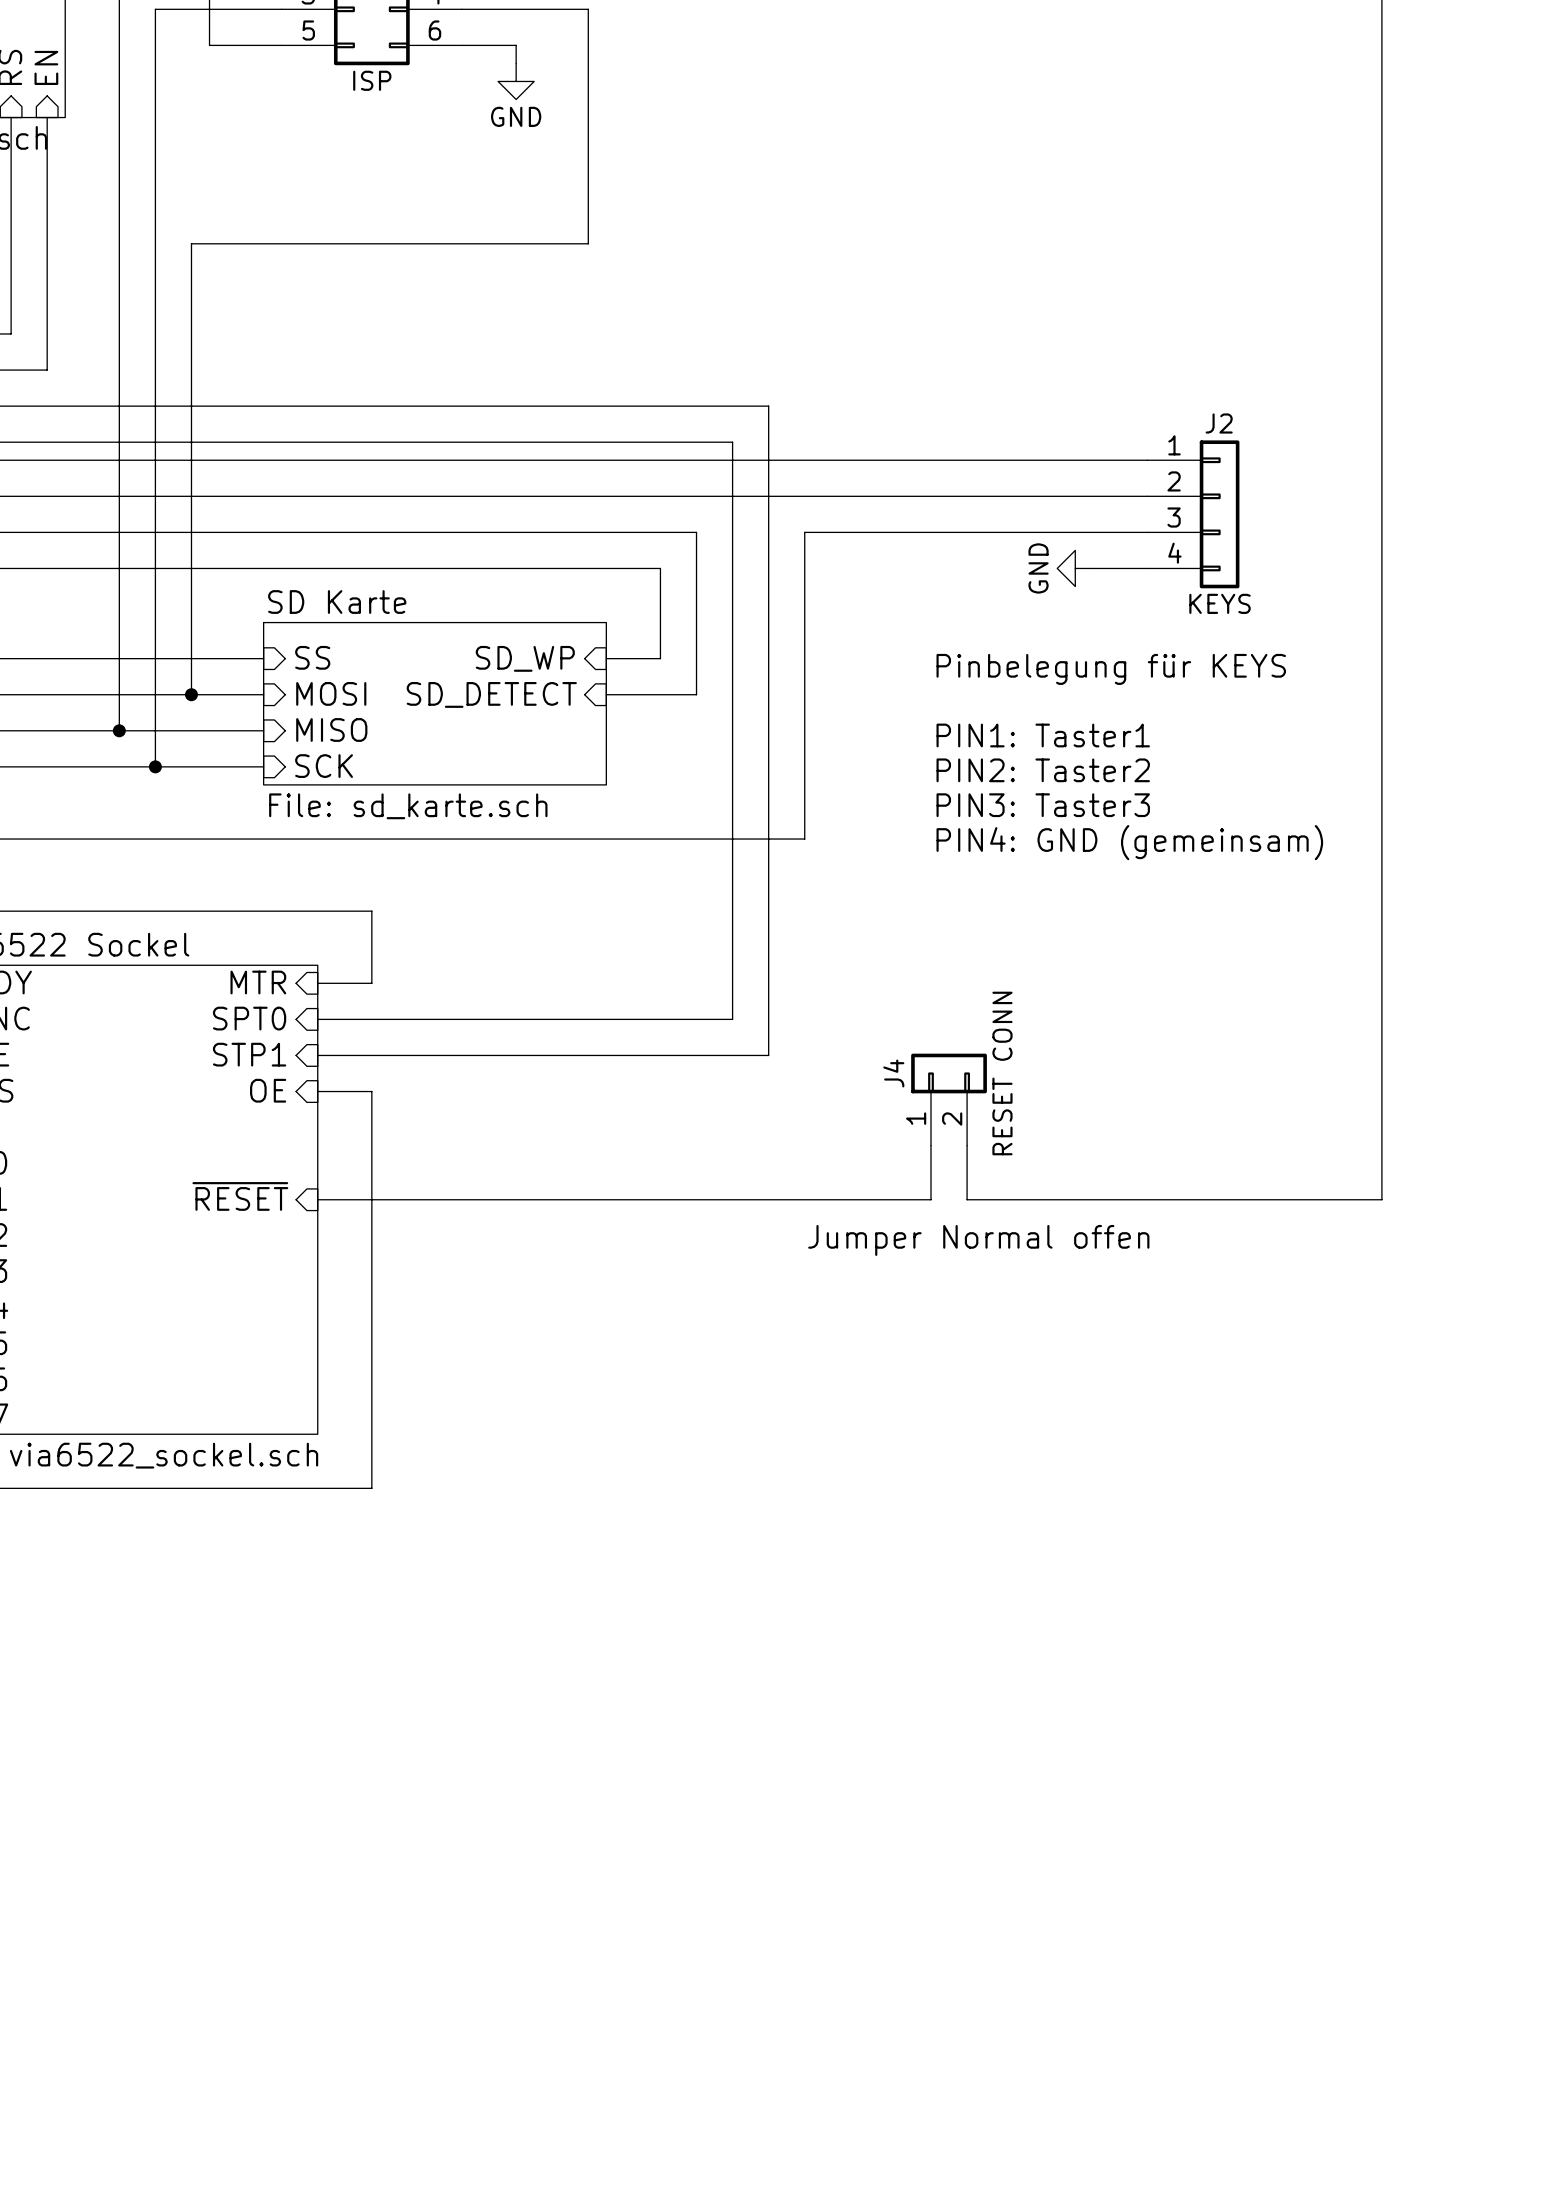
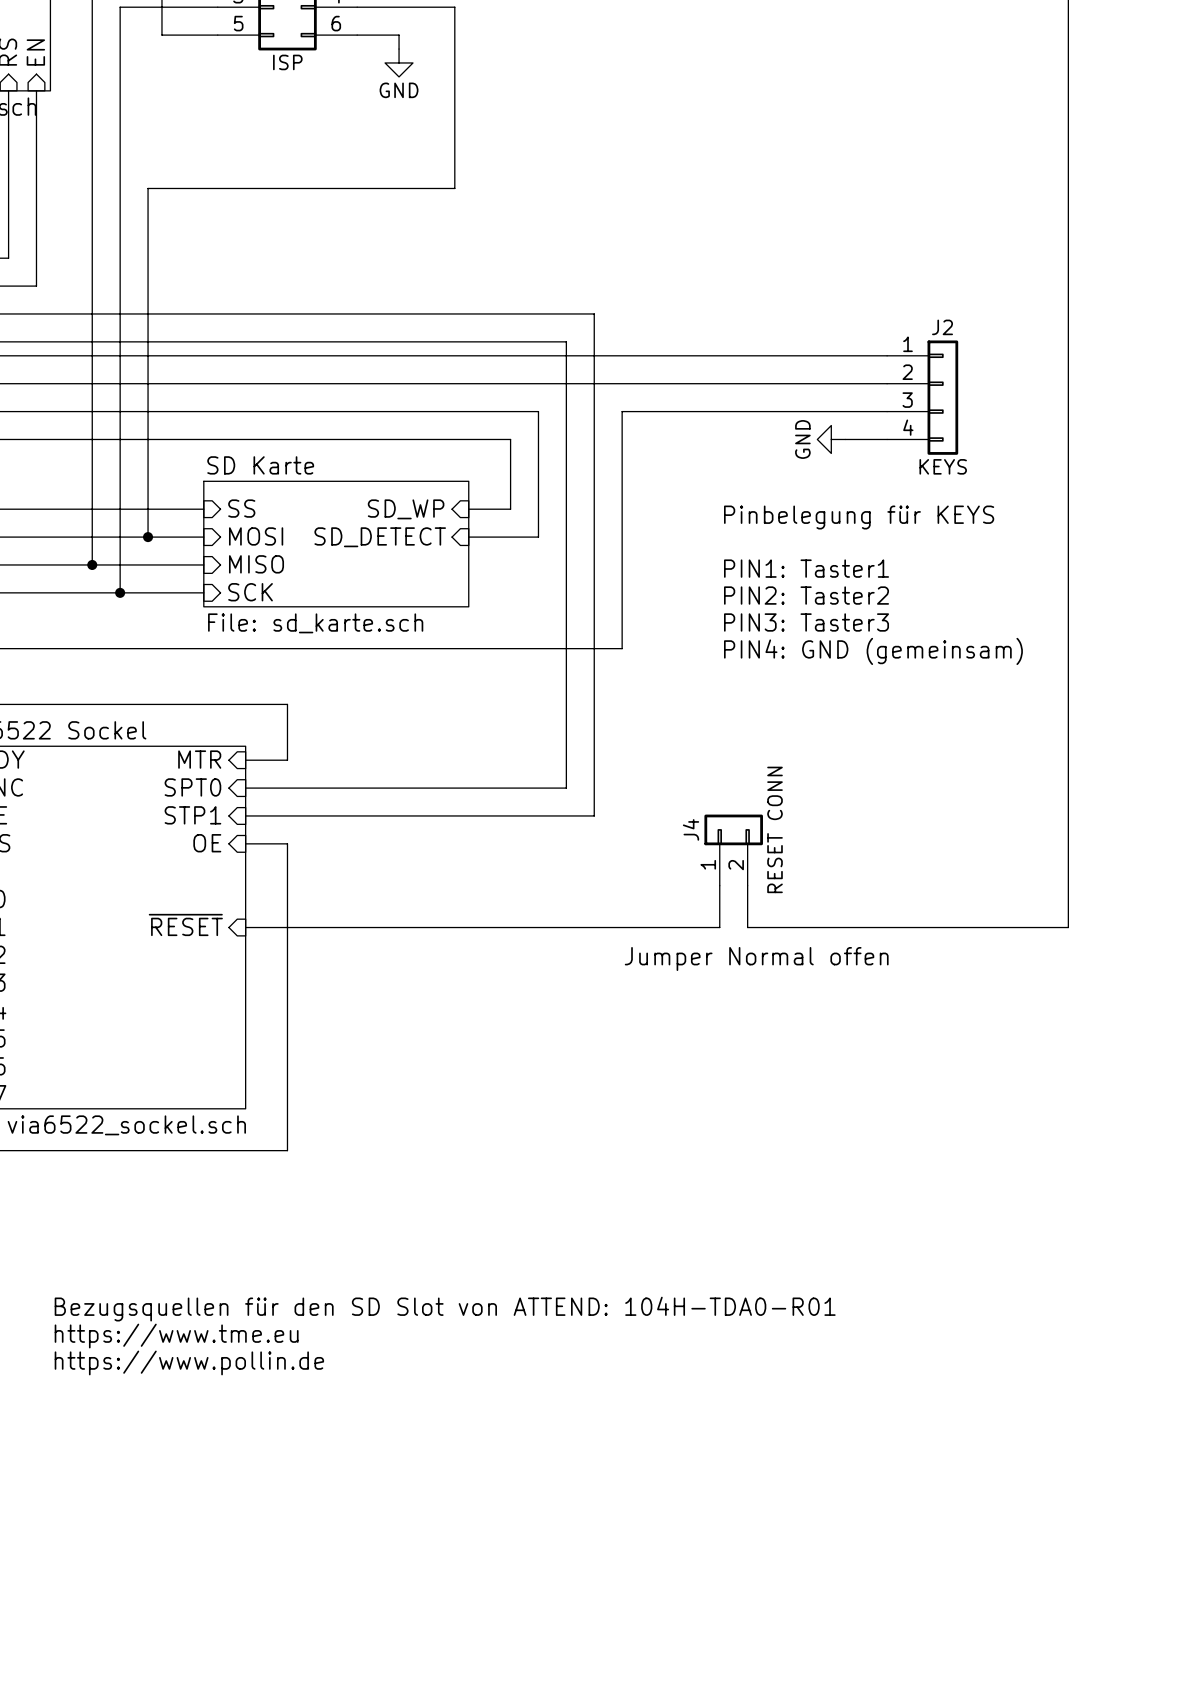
text: none -> Bezugsquellen für den SD Slot von ATTEND: 104H-TDA0-R01 (445, 1309)
text: none -> https://www.tme.eu (176, 1336)
text: none -> https://www.pollin.de (189, 1362)

